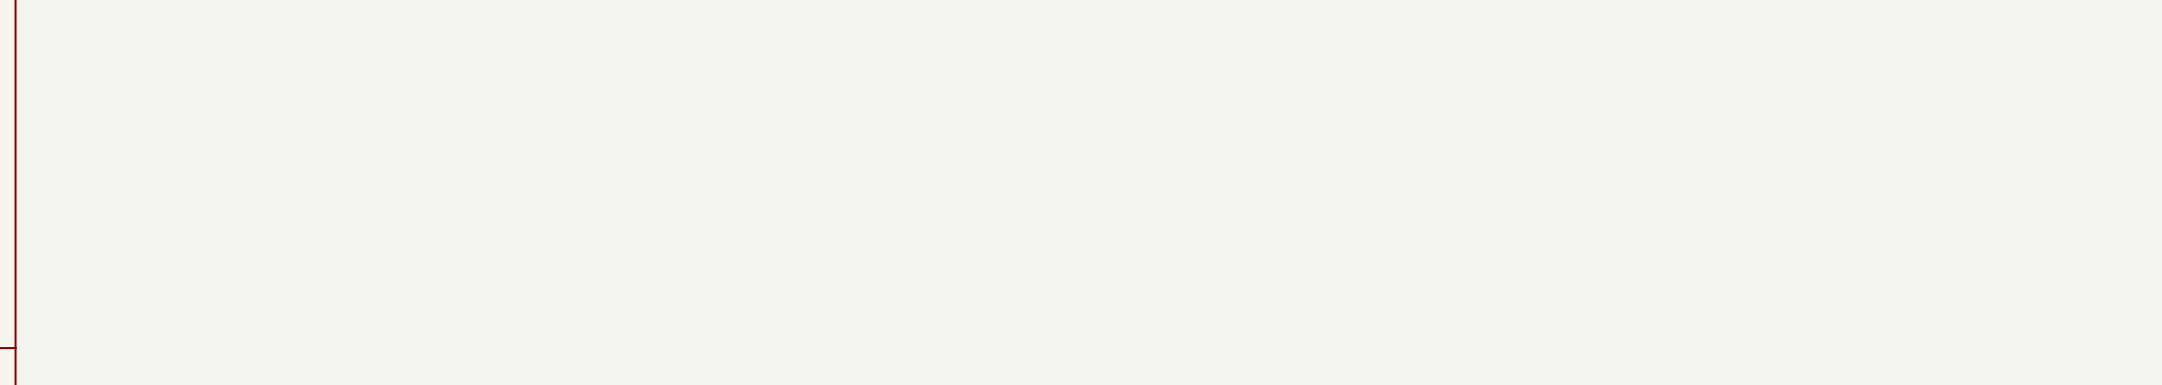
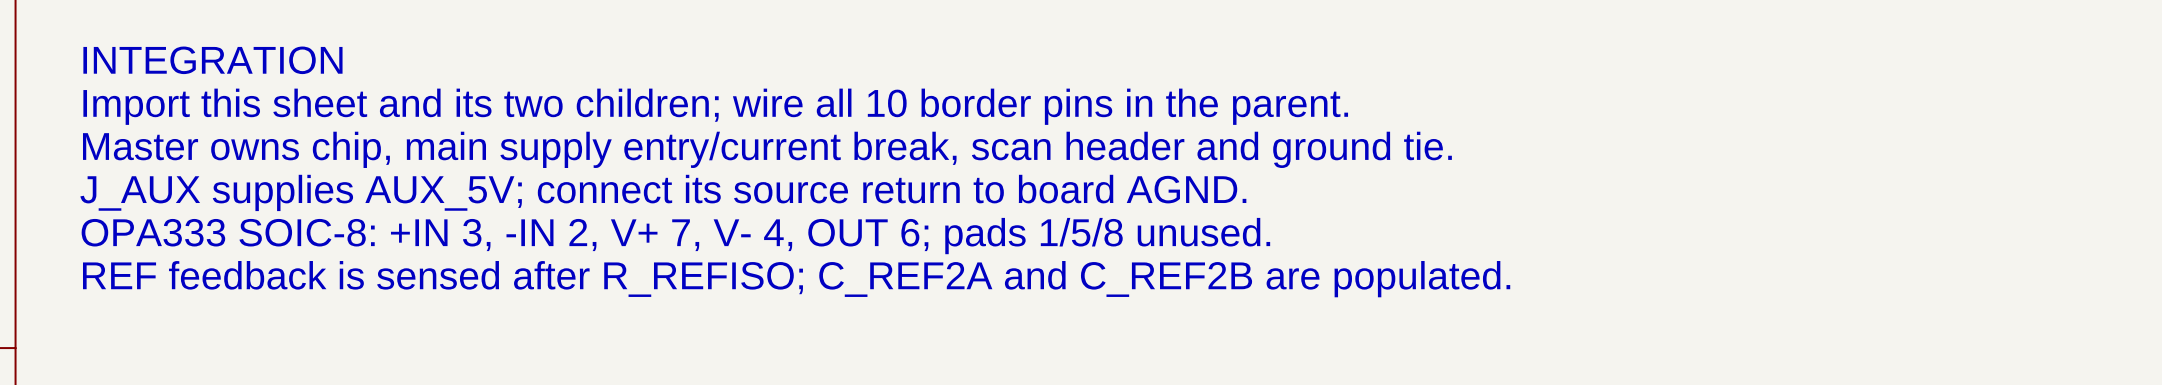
text: none -> INTEGRATION (212, 60)
text: none -> Import this sheet and its two children; wire all 10 border pins in the parent. (715, 106)
text: none -> Master owns chip, main supply entry/current break, scan header and ground tie. (767, 149)
text: none -> J_AUX supplies AUX_5V; connect its source return to board AGND. (663, 192)
text: none -> OPA333 SOIC-8: +IN 3, -IN 2, V+ 7, V- 4, OUT 6; pads 1/5/8 unused. (675, 236)
text: none -> REF feedback is sensed after R_REFISO; C_REF2A and C_REF2B are populated. (796, 279)

